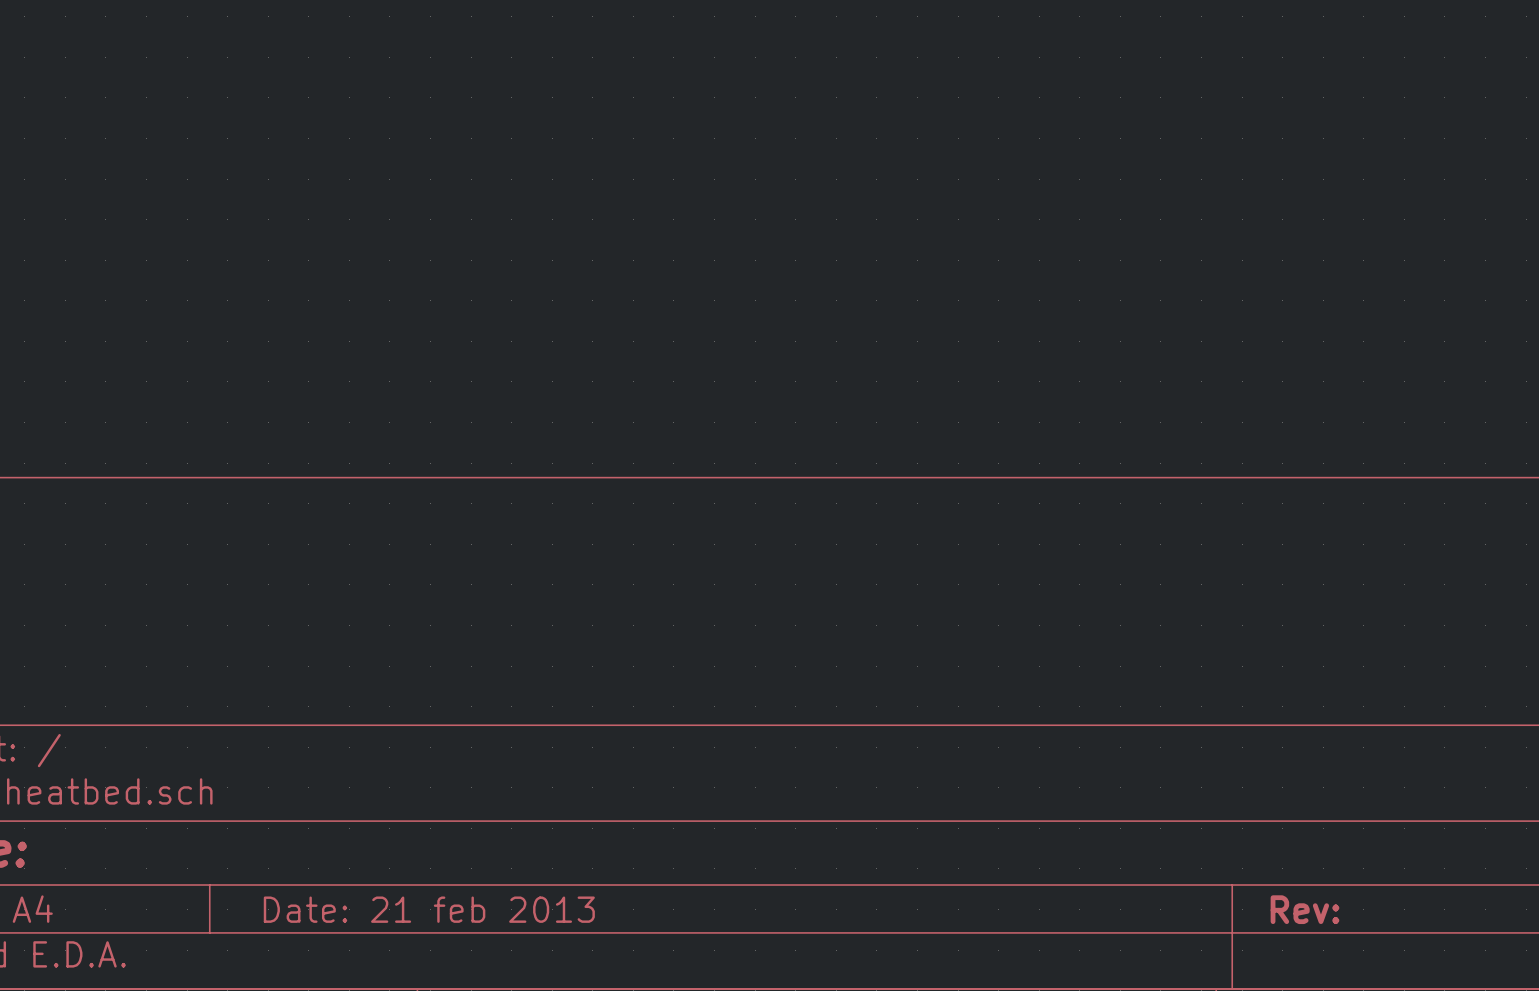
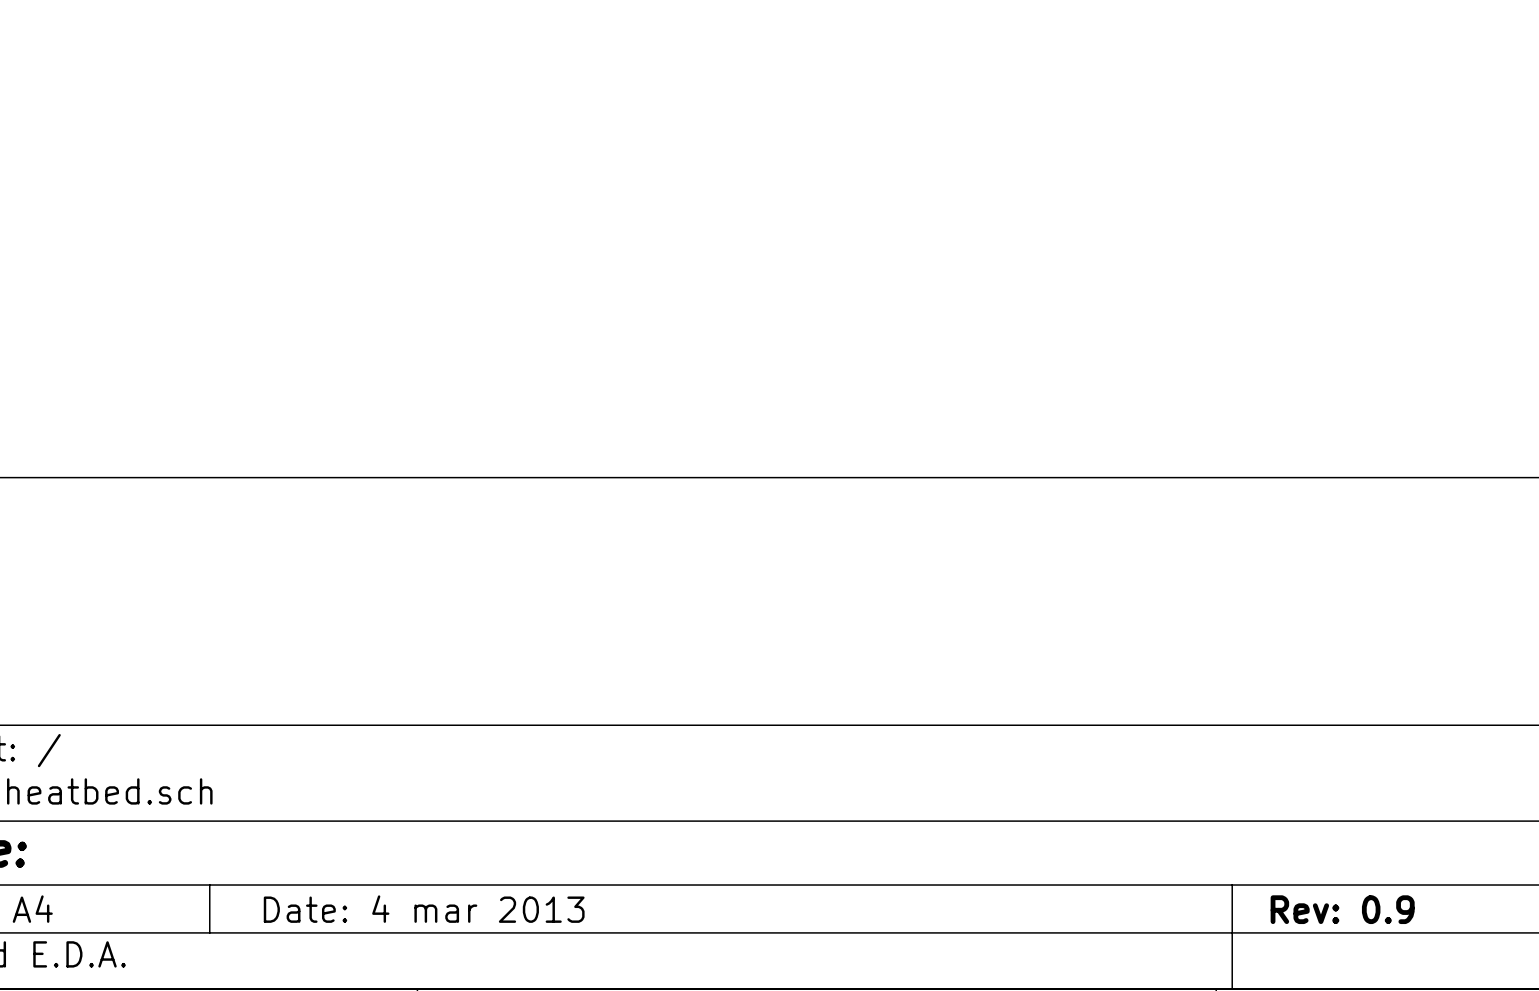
title block: Date: 21 feb 2013 (429, 909) -> Date: 4 mar 2013 (424, 909)
title block: Rev: (1304, 909) -> Rev: 0.9 (1342, 909)

